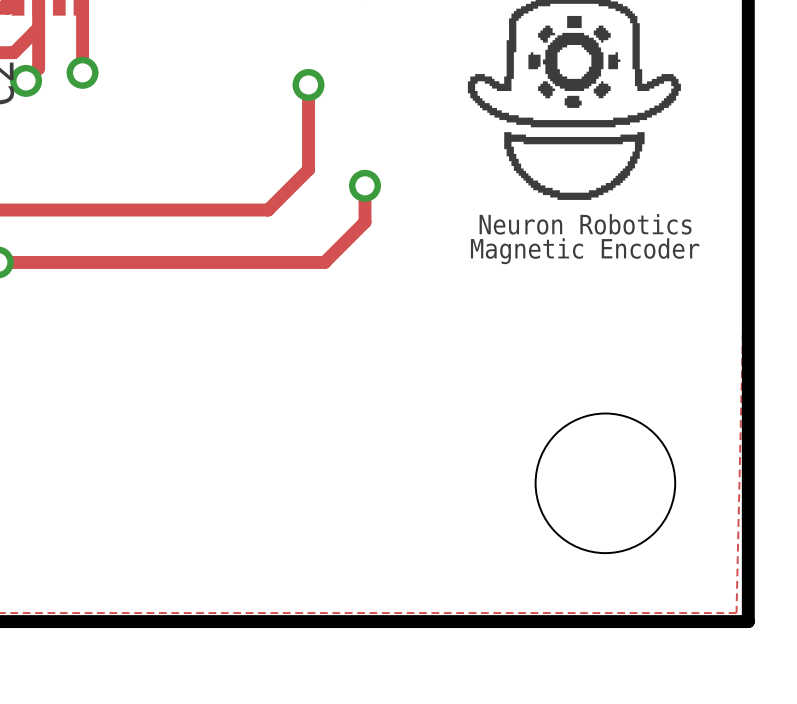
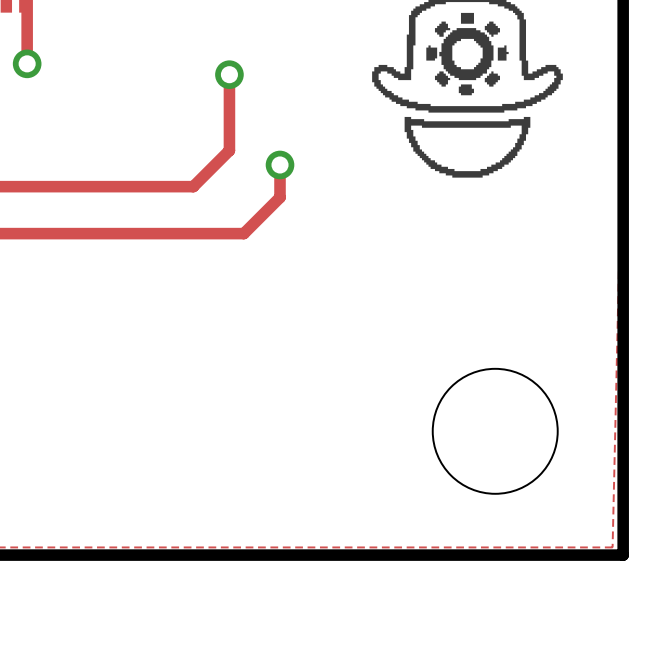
text: Neuron Robotics (585, 224) -> none
text: Magnetic Encoder (585, 251) -> none

